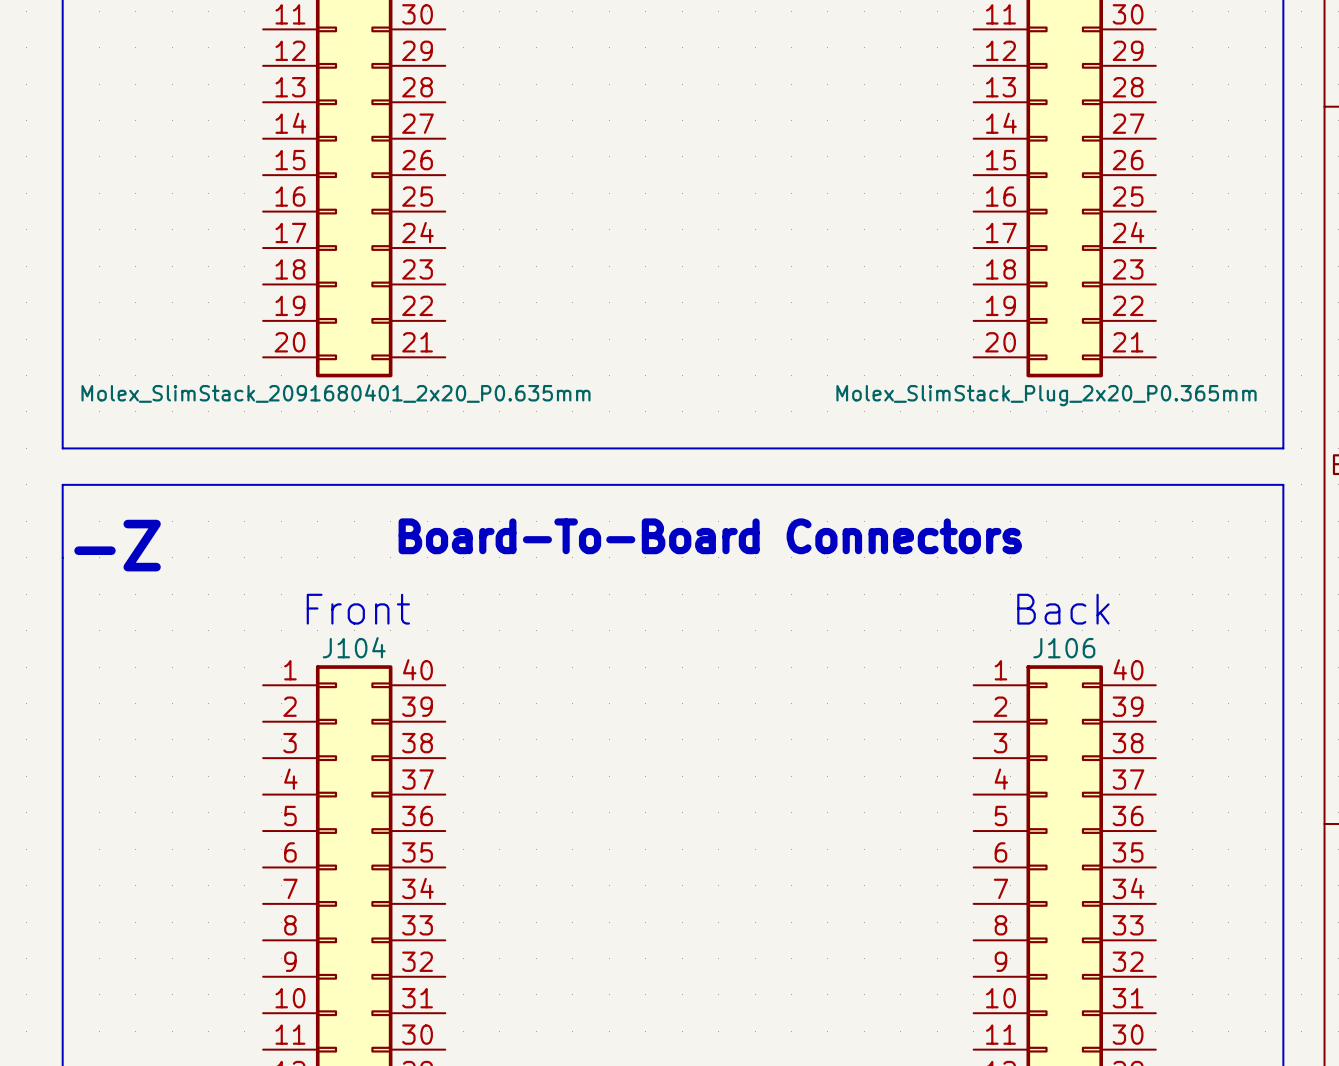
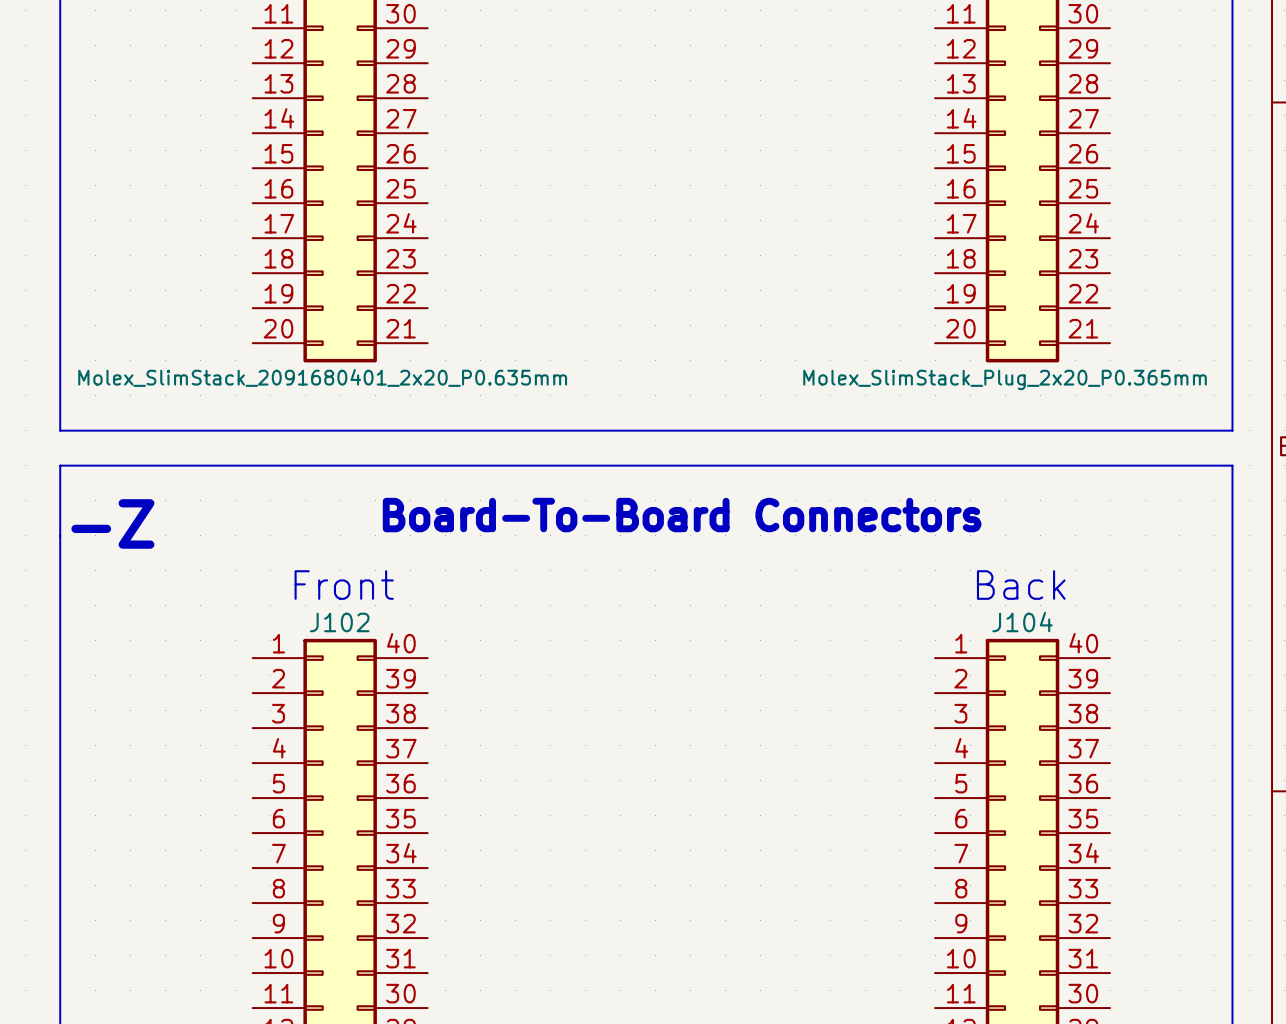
J104 name: J104 (354, 647) -> J102 (339, 622)
J106 name: J106 (1064, 648) -> J104 (1022, 622)

